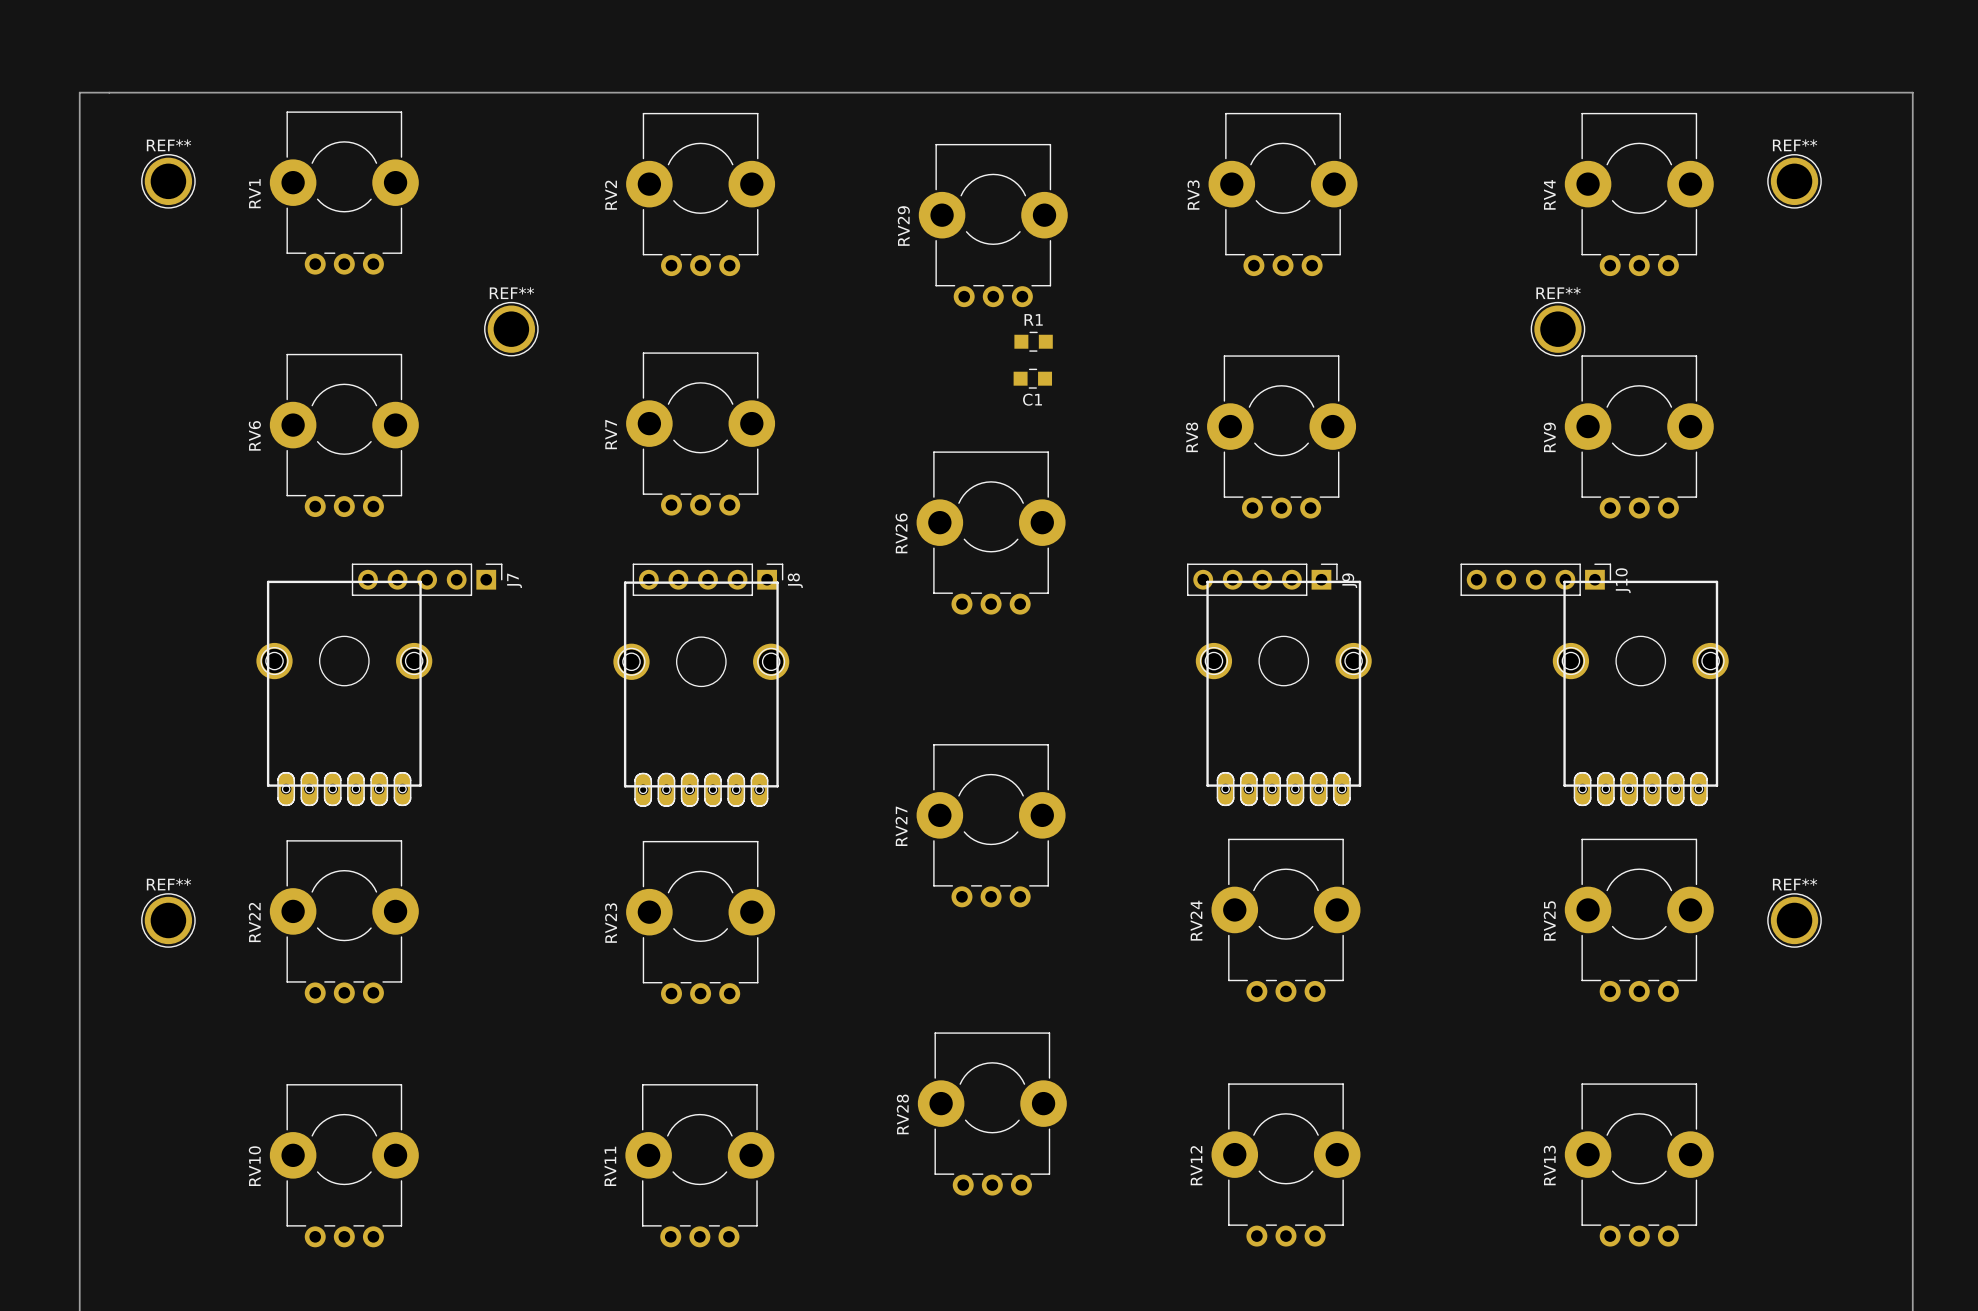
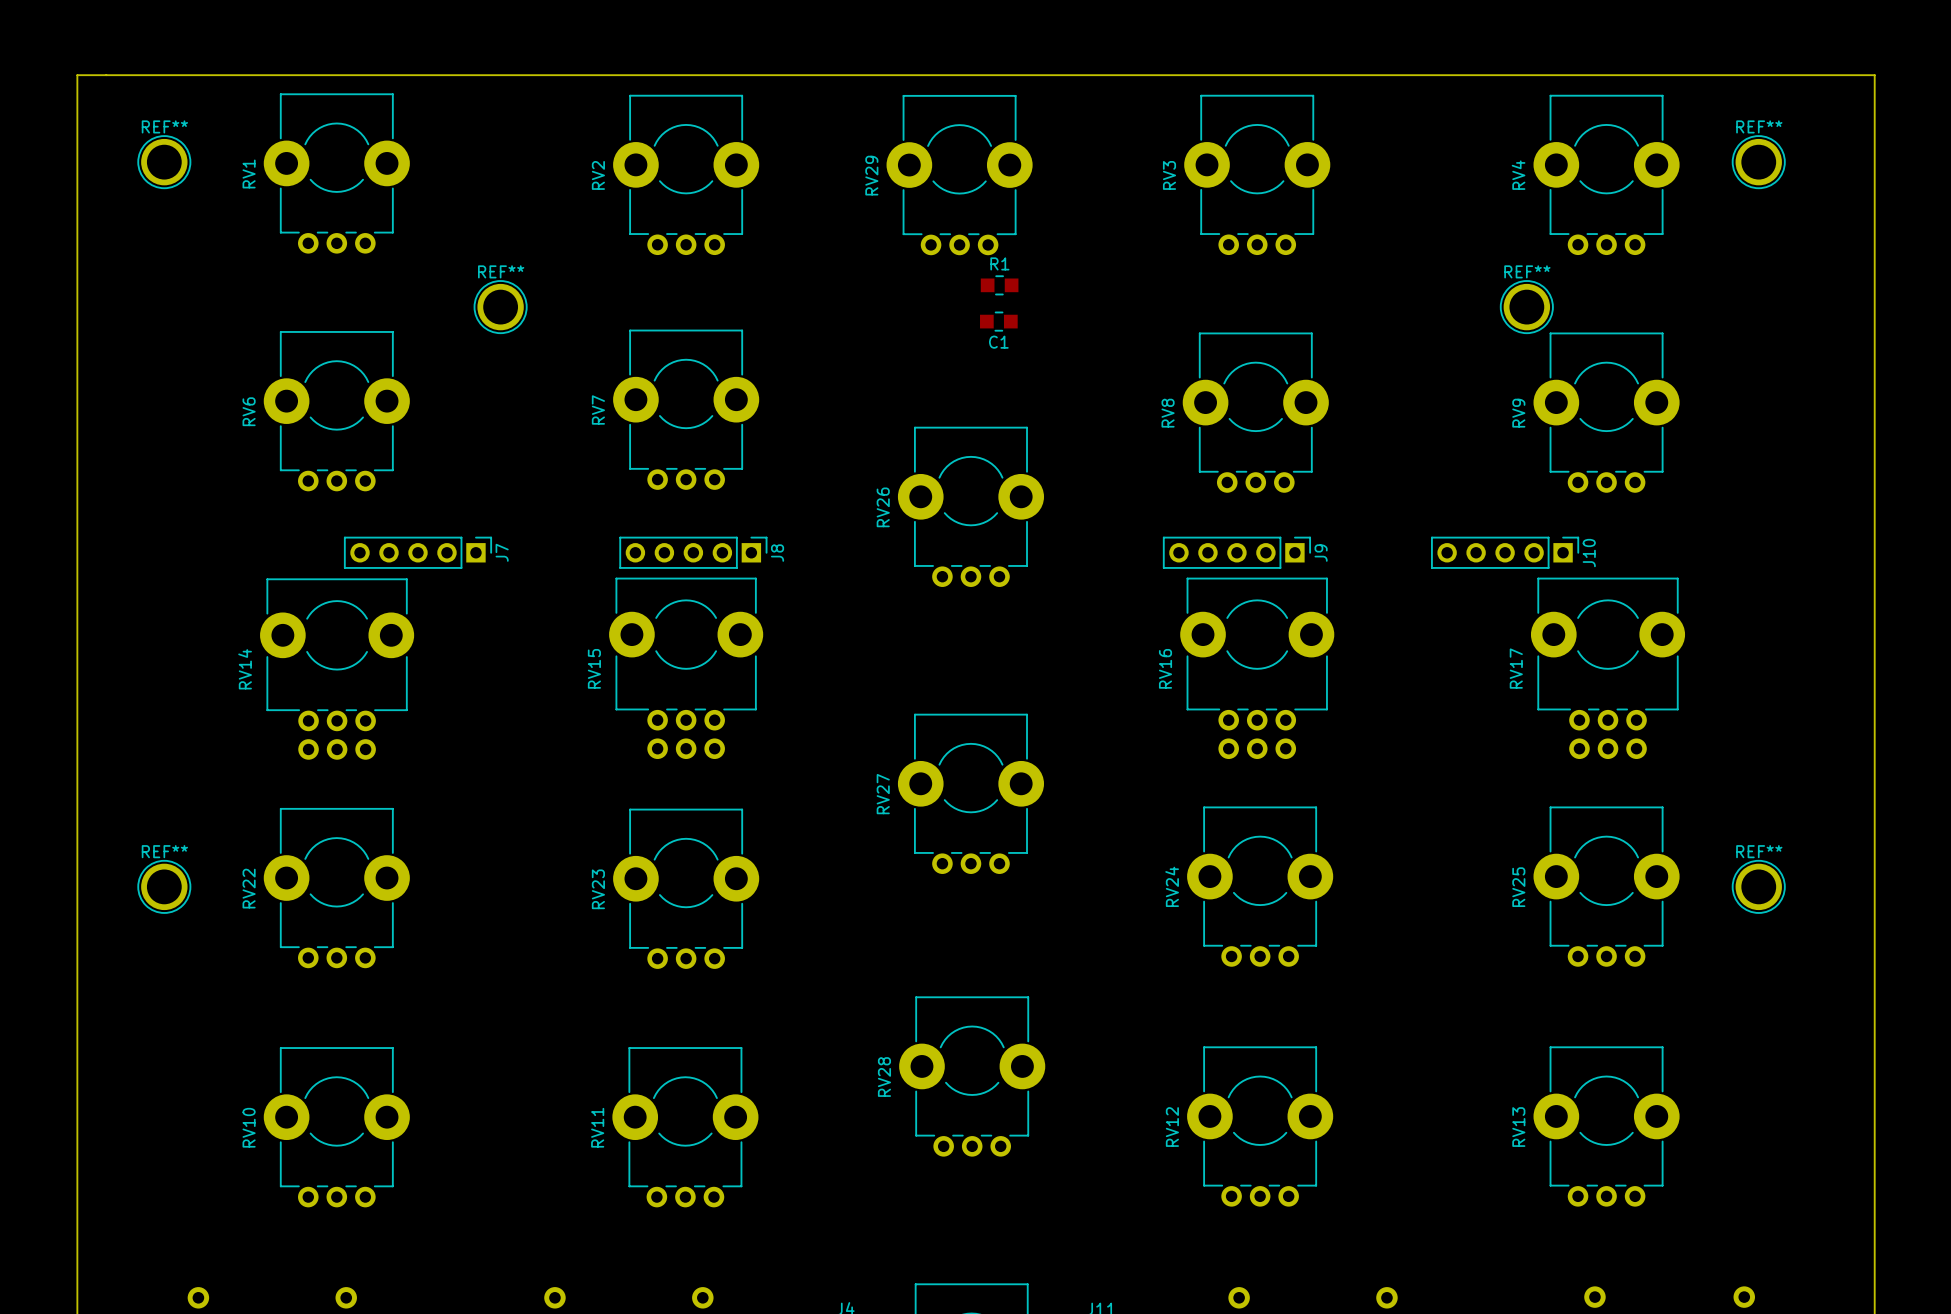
RV29 position: (993, 225) -> (959, 175)
R1 position: (1033, 341) -> (999, 285)
C1 position: (1032, 378) -> (998, 321)
part: (344, 693) -> none
part: (1283, 693) -> none
part: (1640, 693) -> none
part: (701, 694) -> none
RV15: none -> (686, 668)
RV16: none -> (1257, 668)
RV17: none -> (1608, 668)
RV14: none -> (337, 669)

